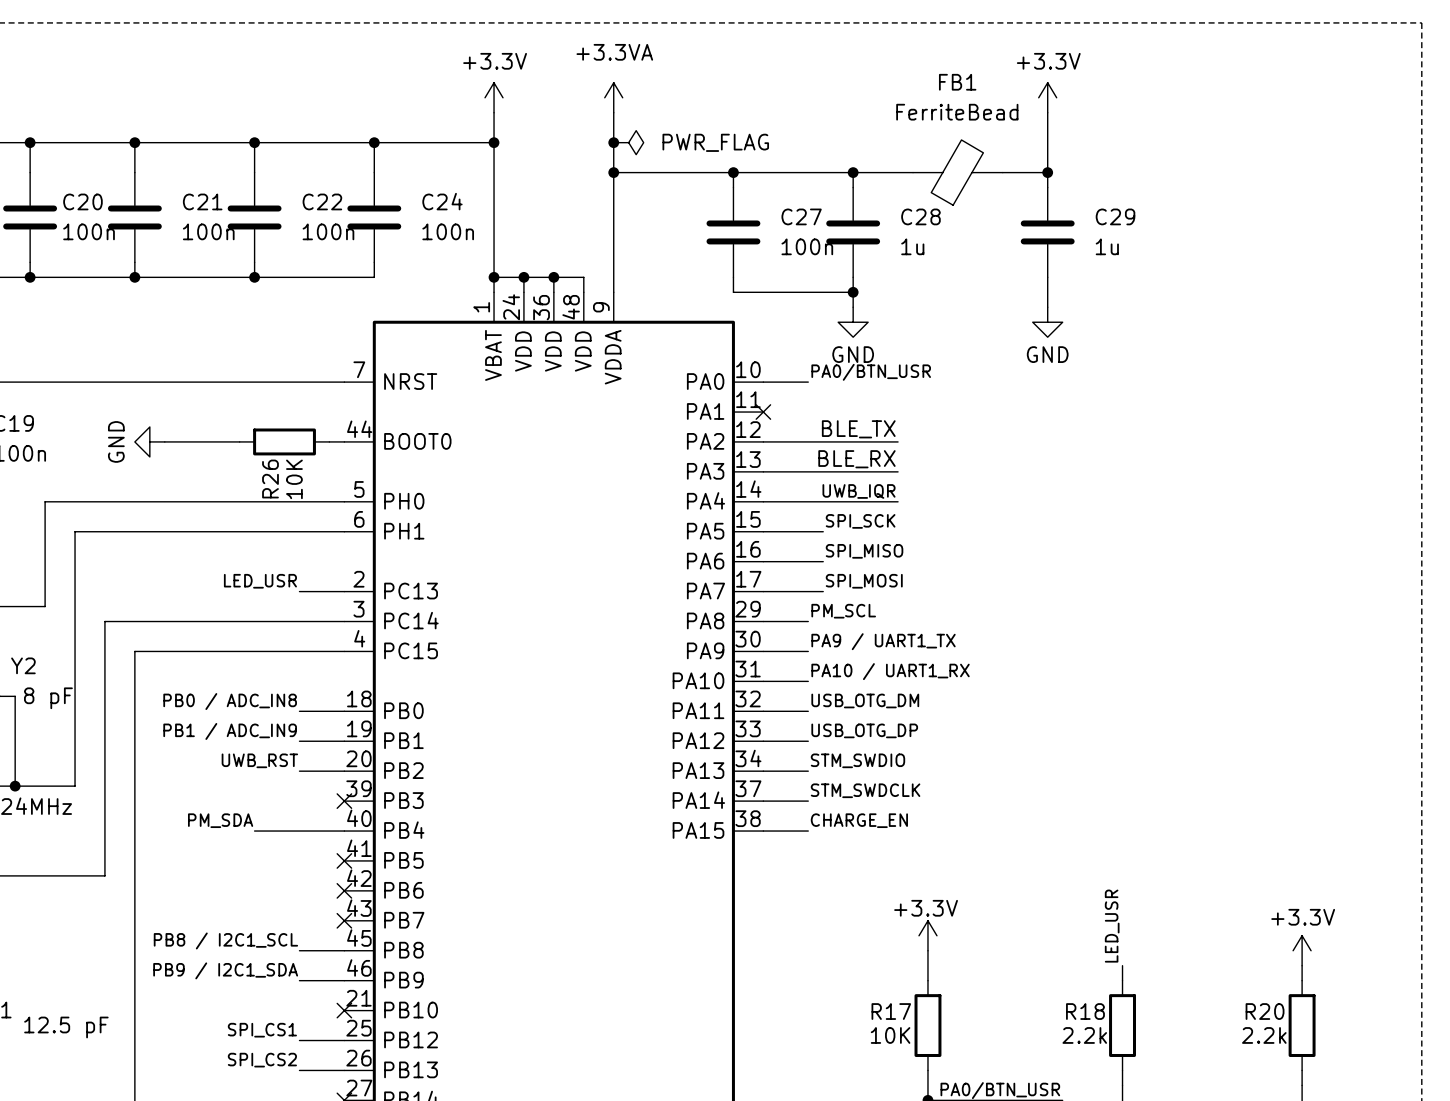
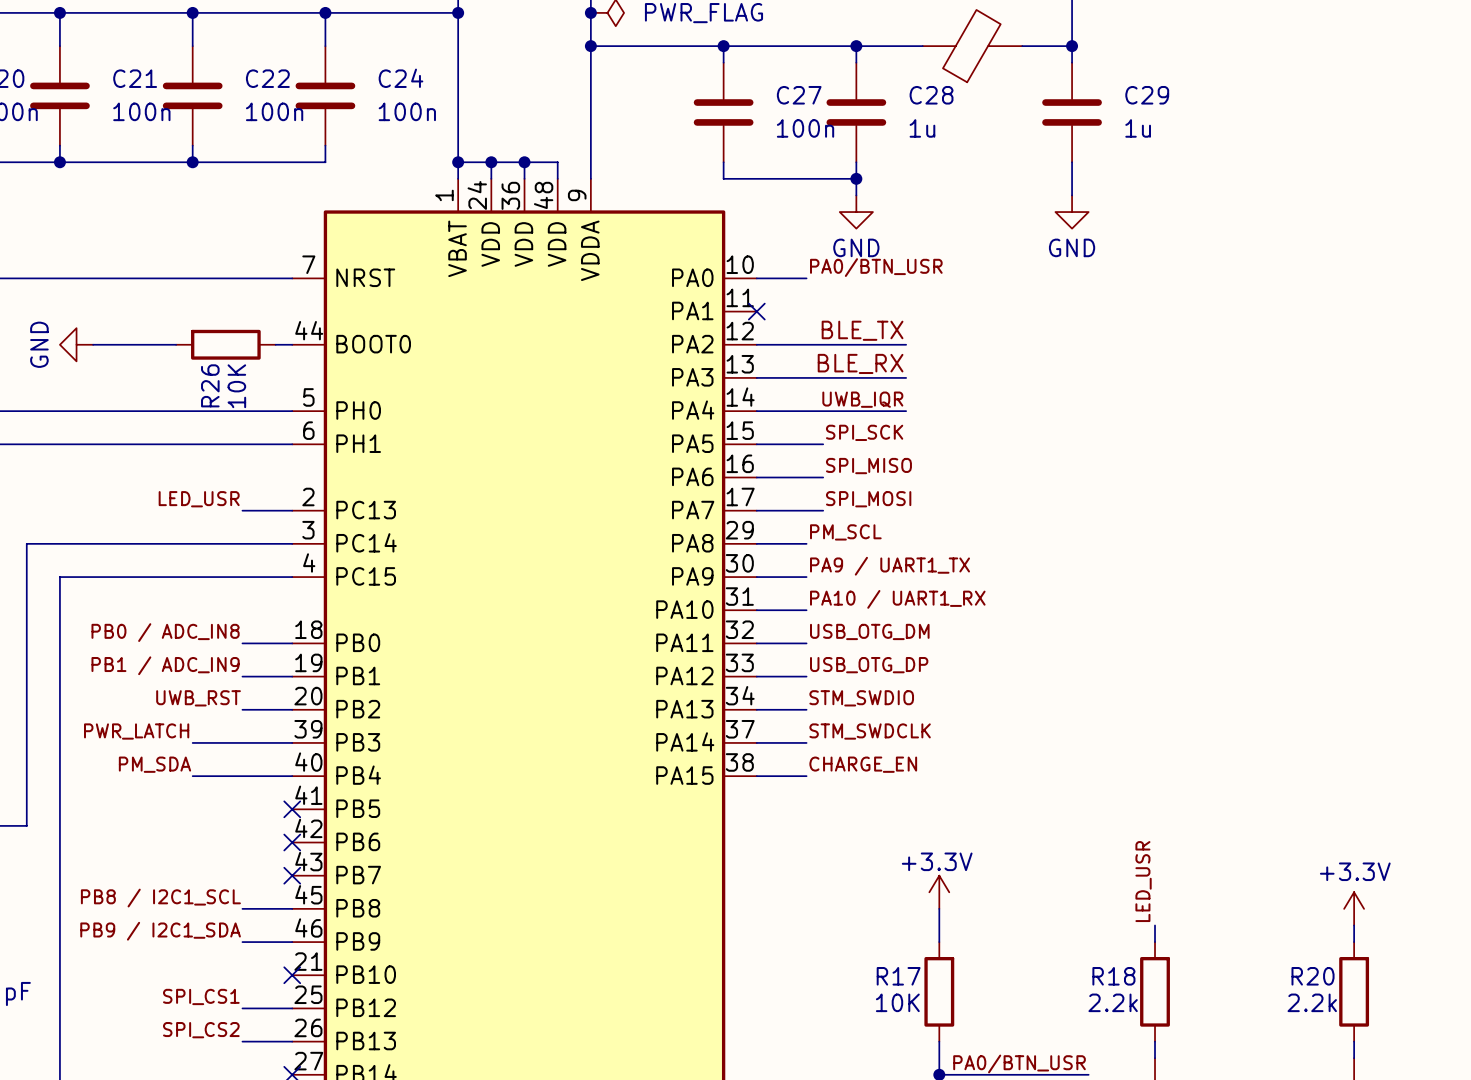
label: none -> PWR_LATCH (136, 731)
wire: none -> (192, 742) (292, 742)
no-connect mark: (344, 801) -> none

